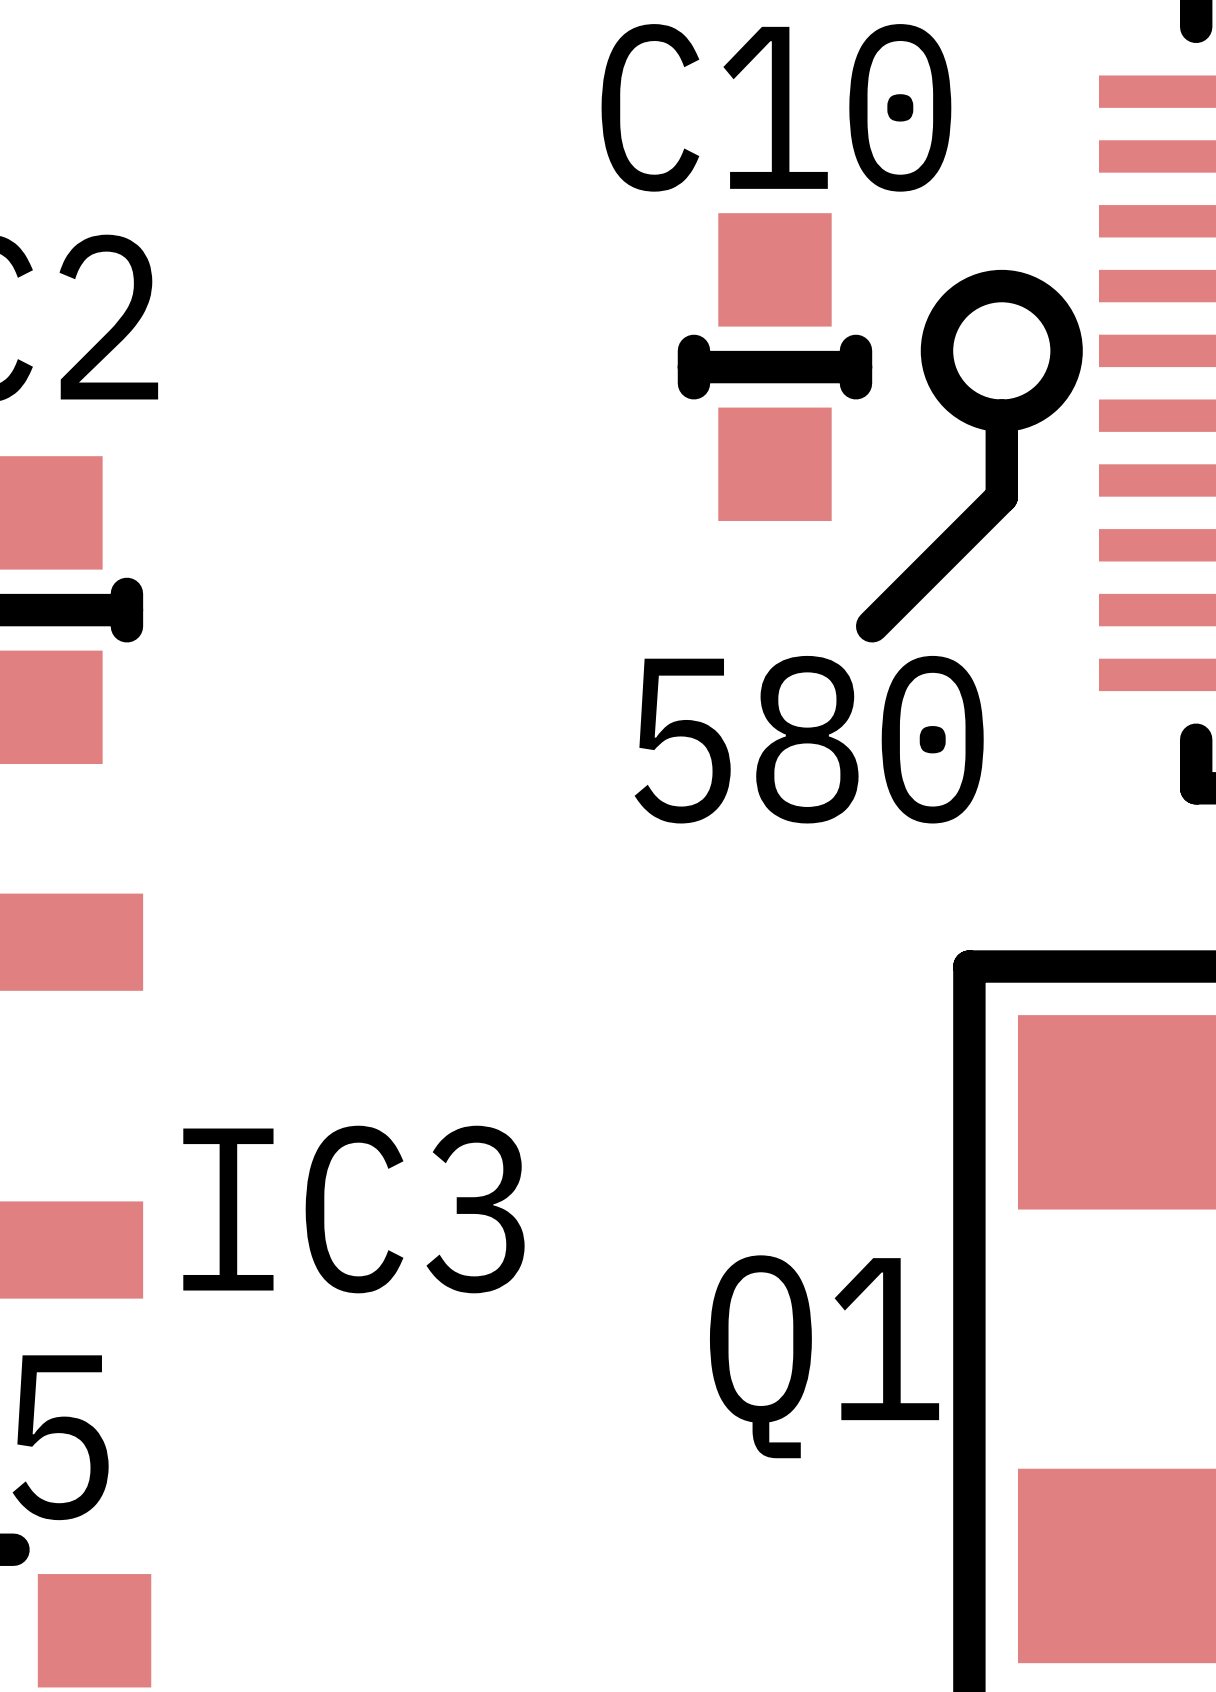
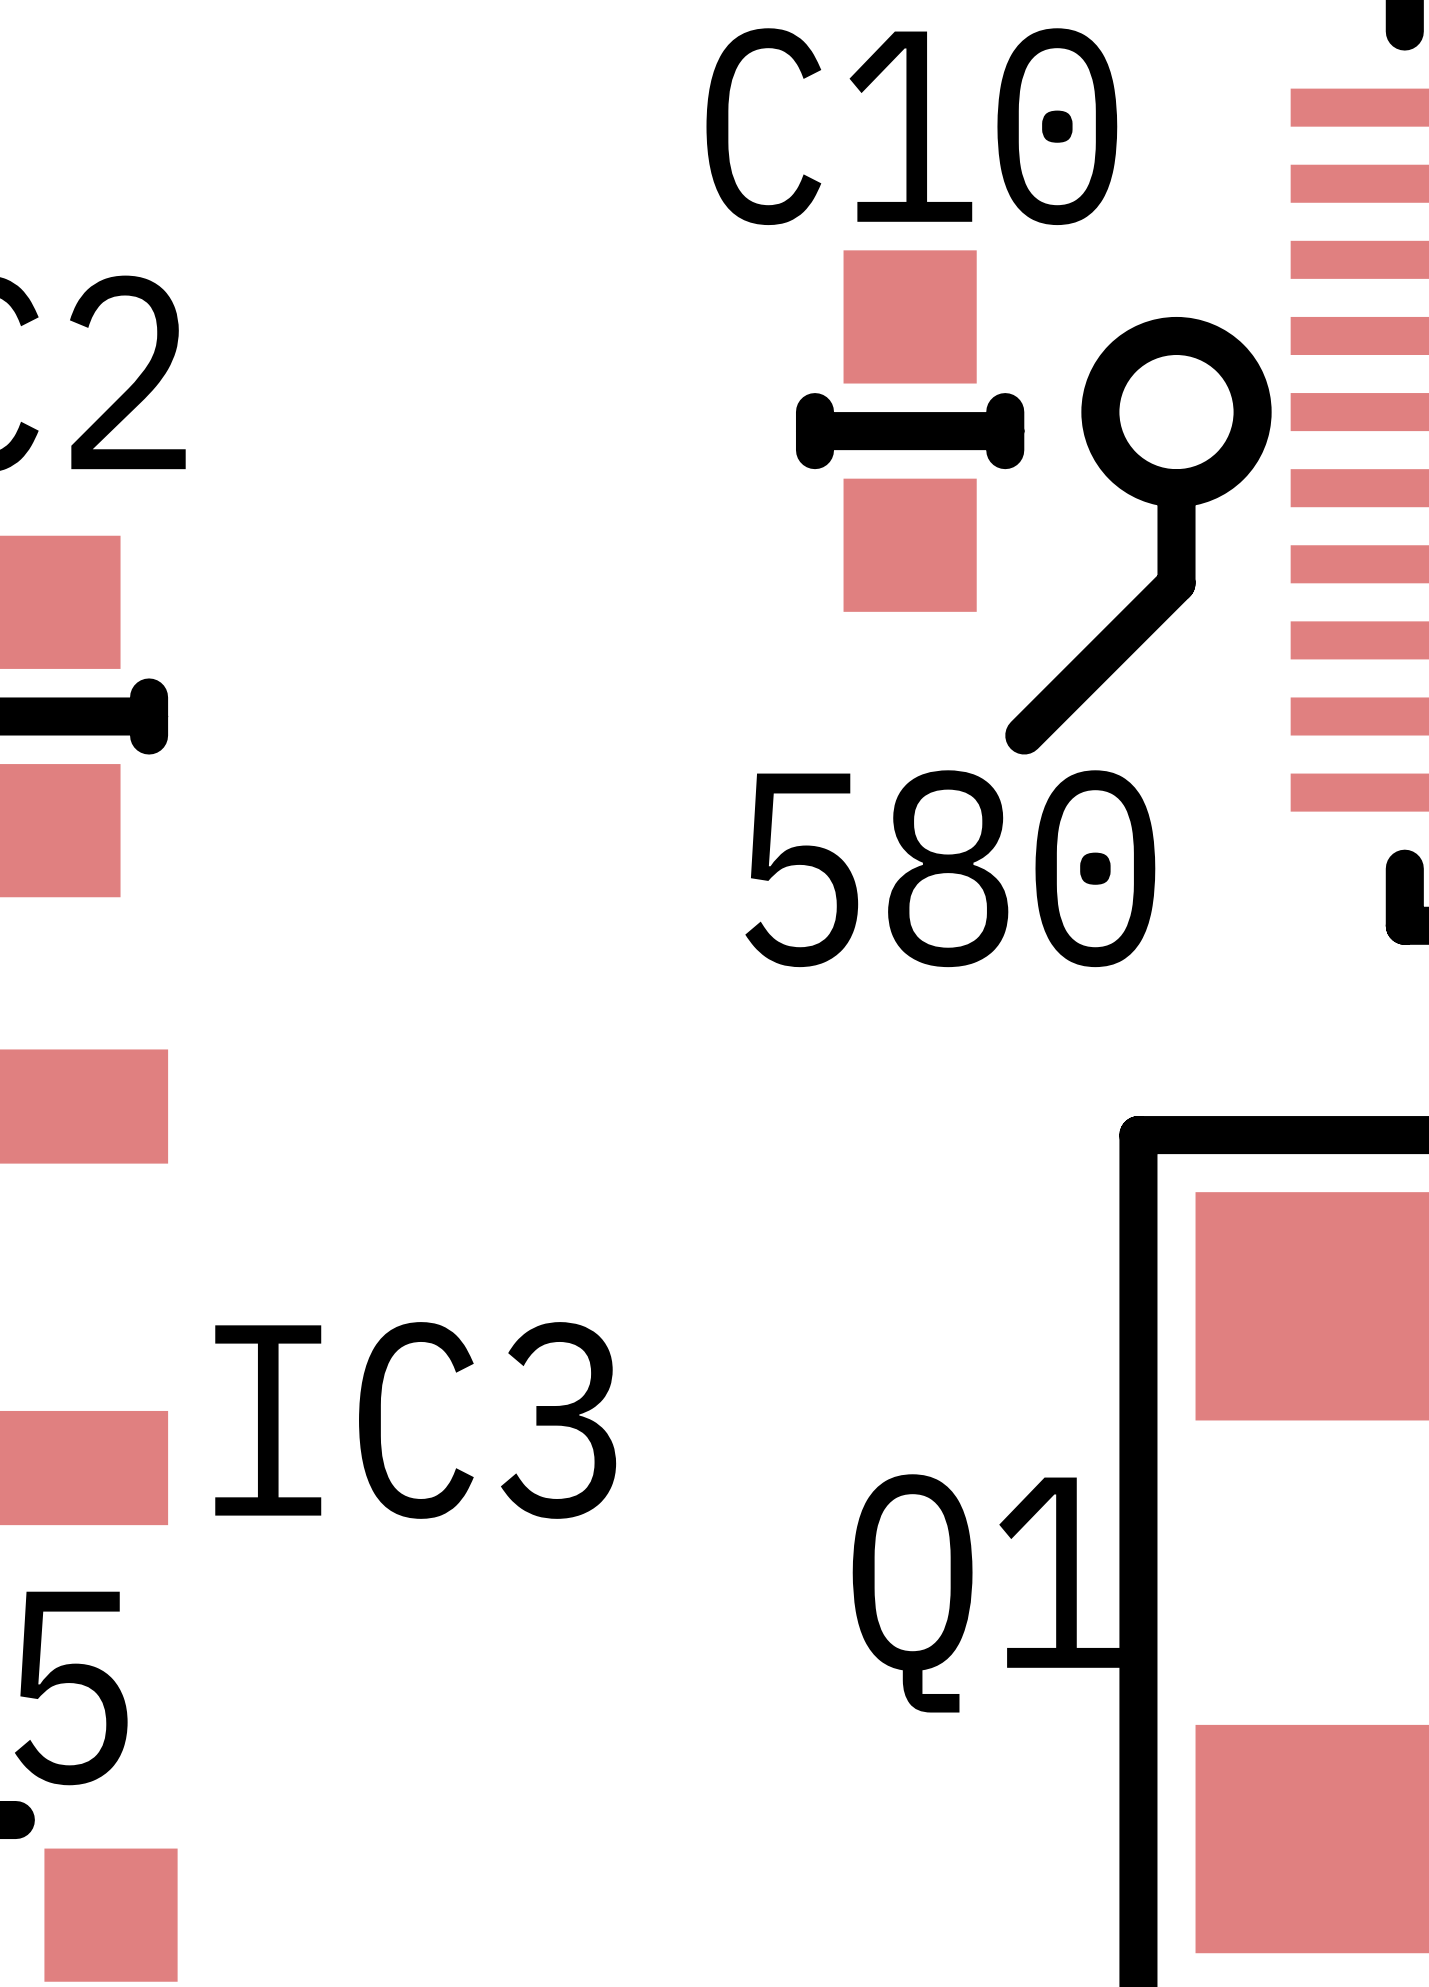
Q1 name position: Q1 (824, 1356) -> Q1 (987, 1593)

